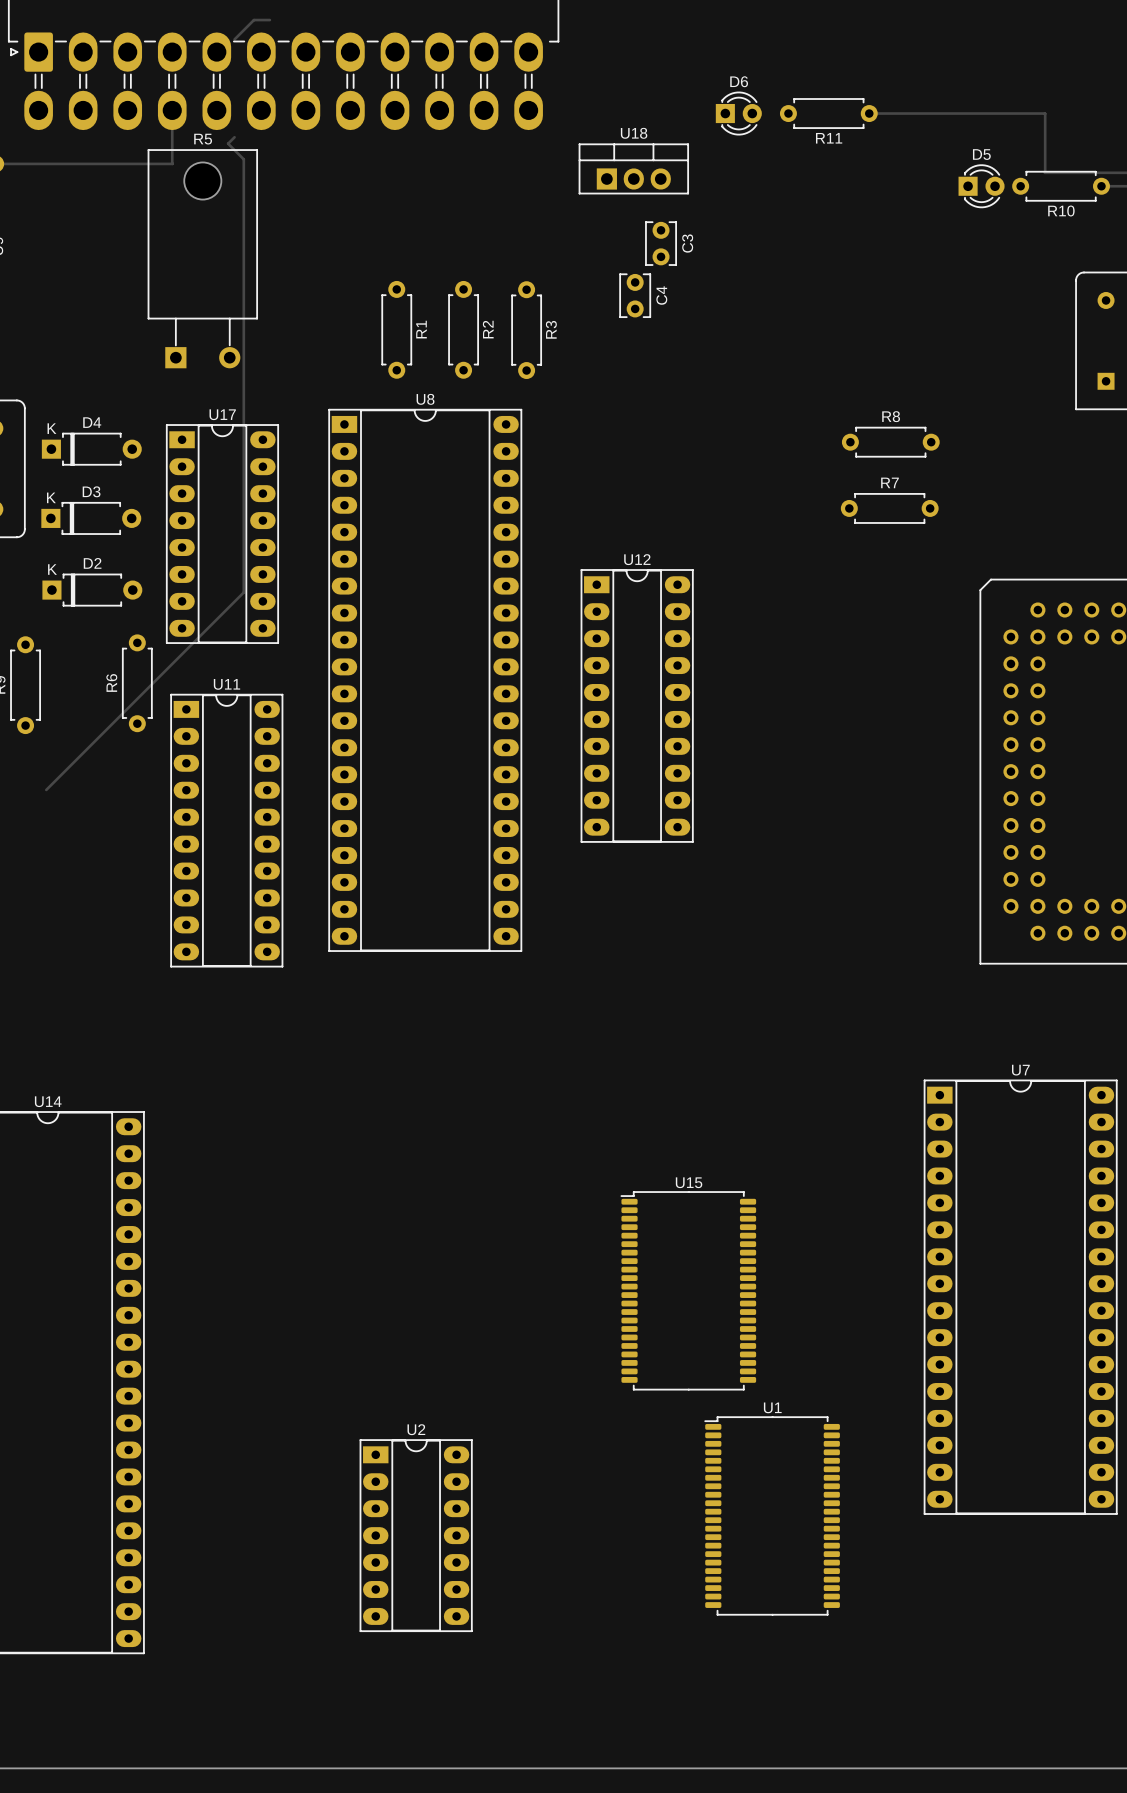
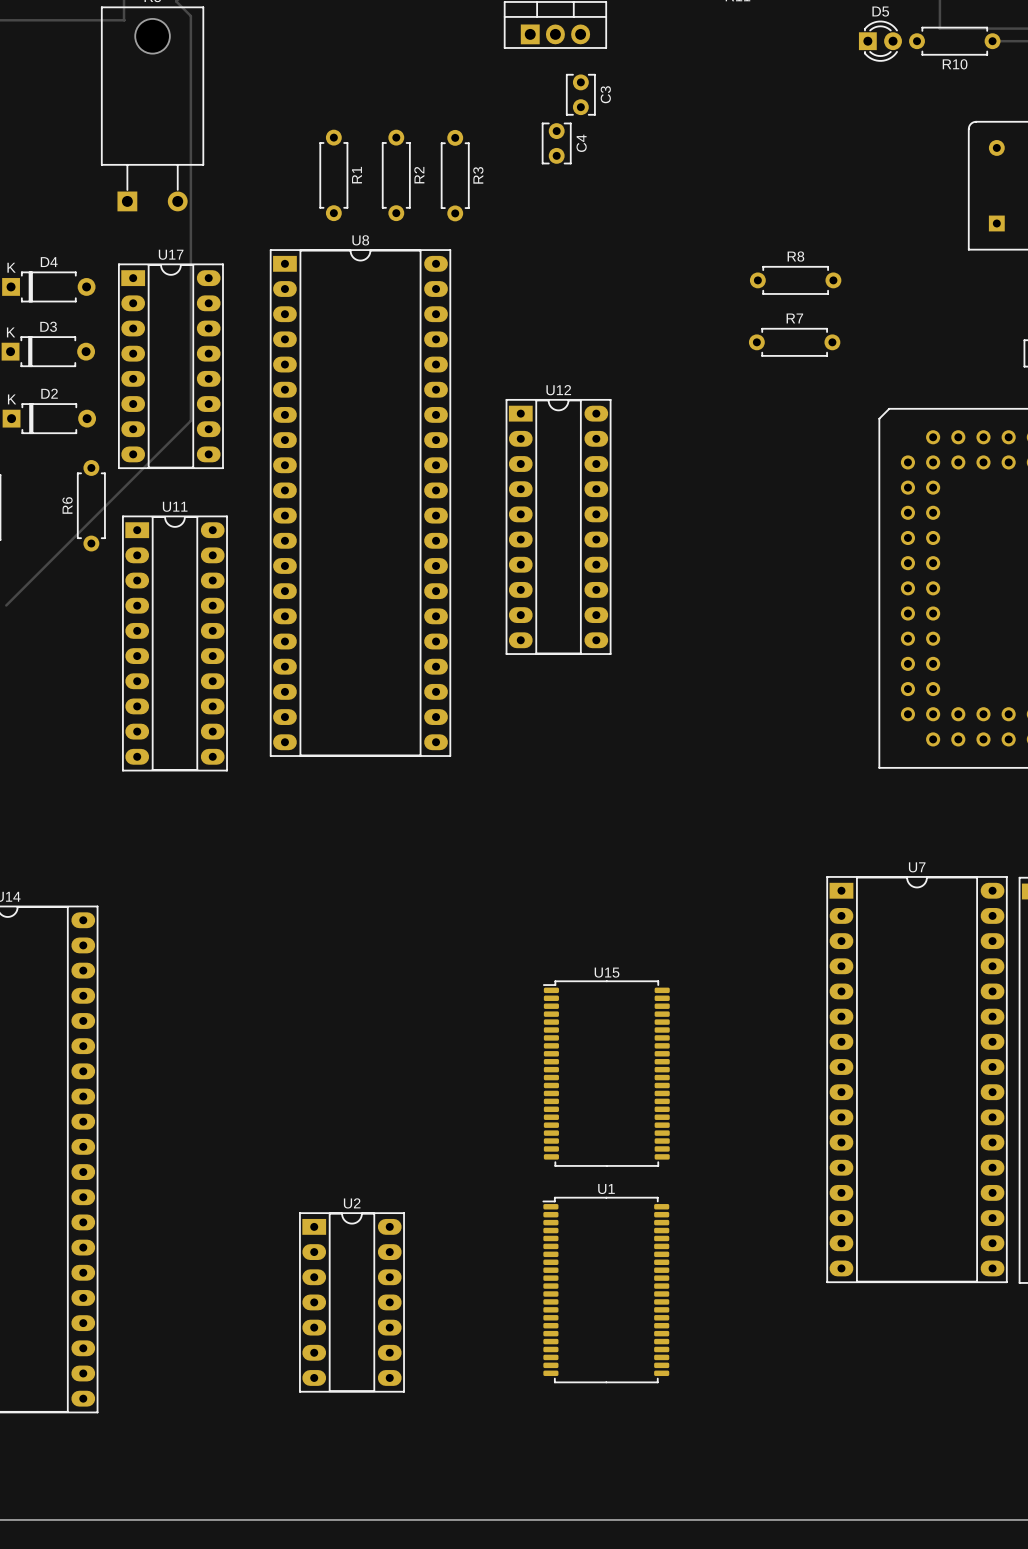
U1 position: (772, 1515) -> (606, 1290)

